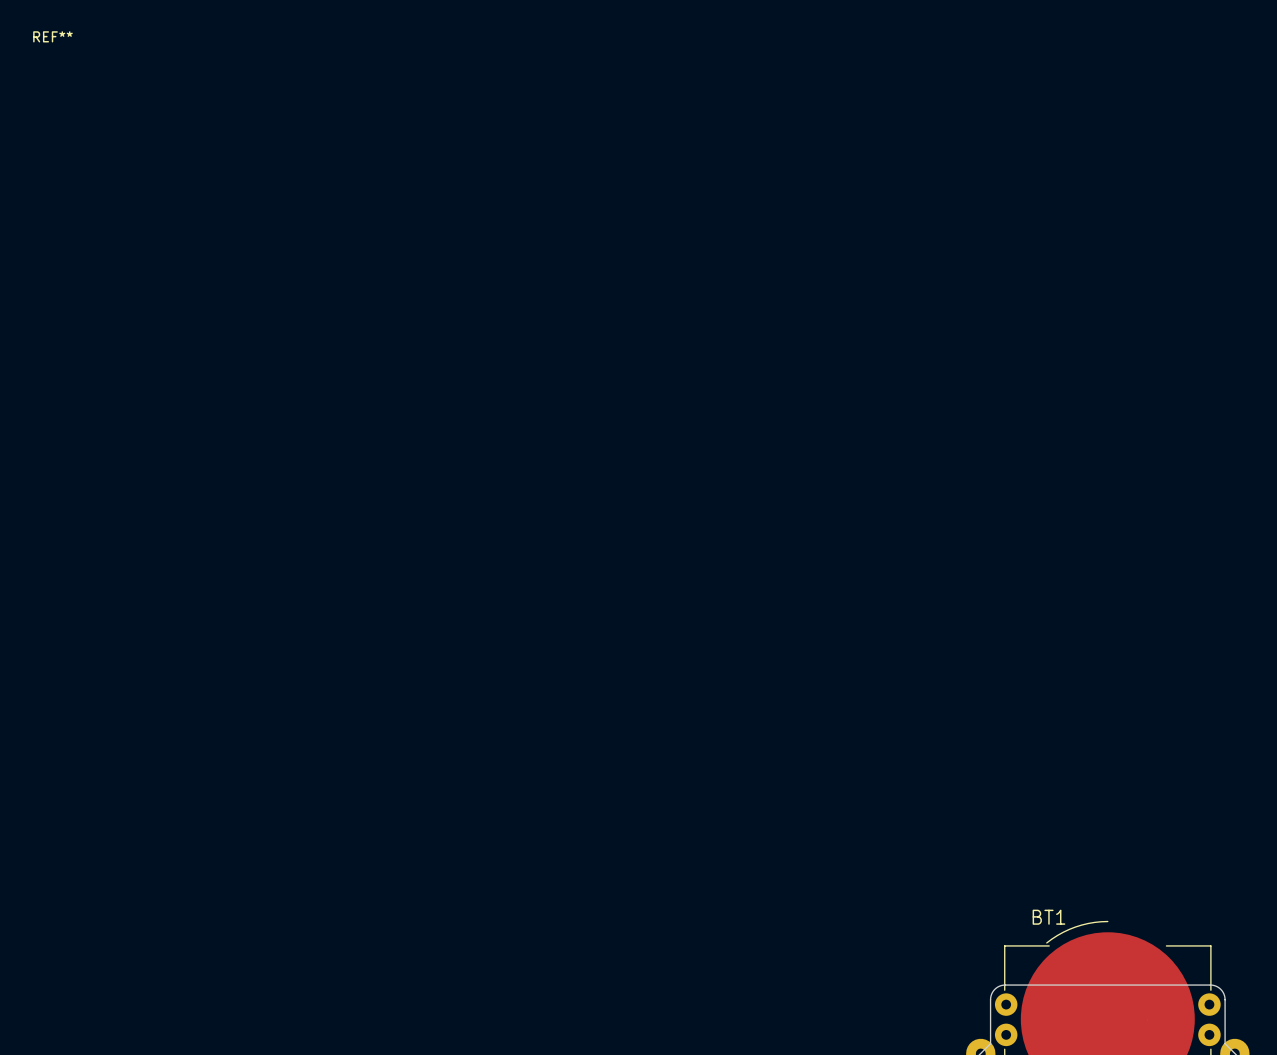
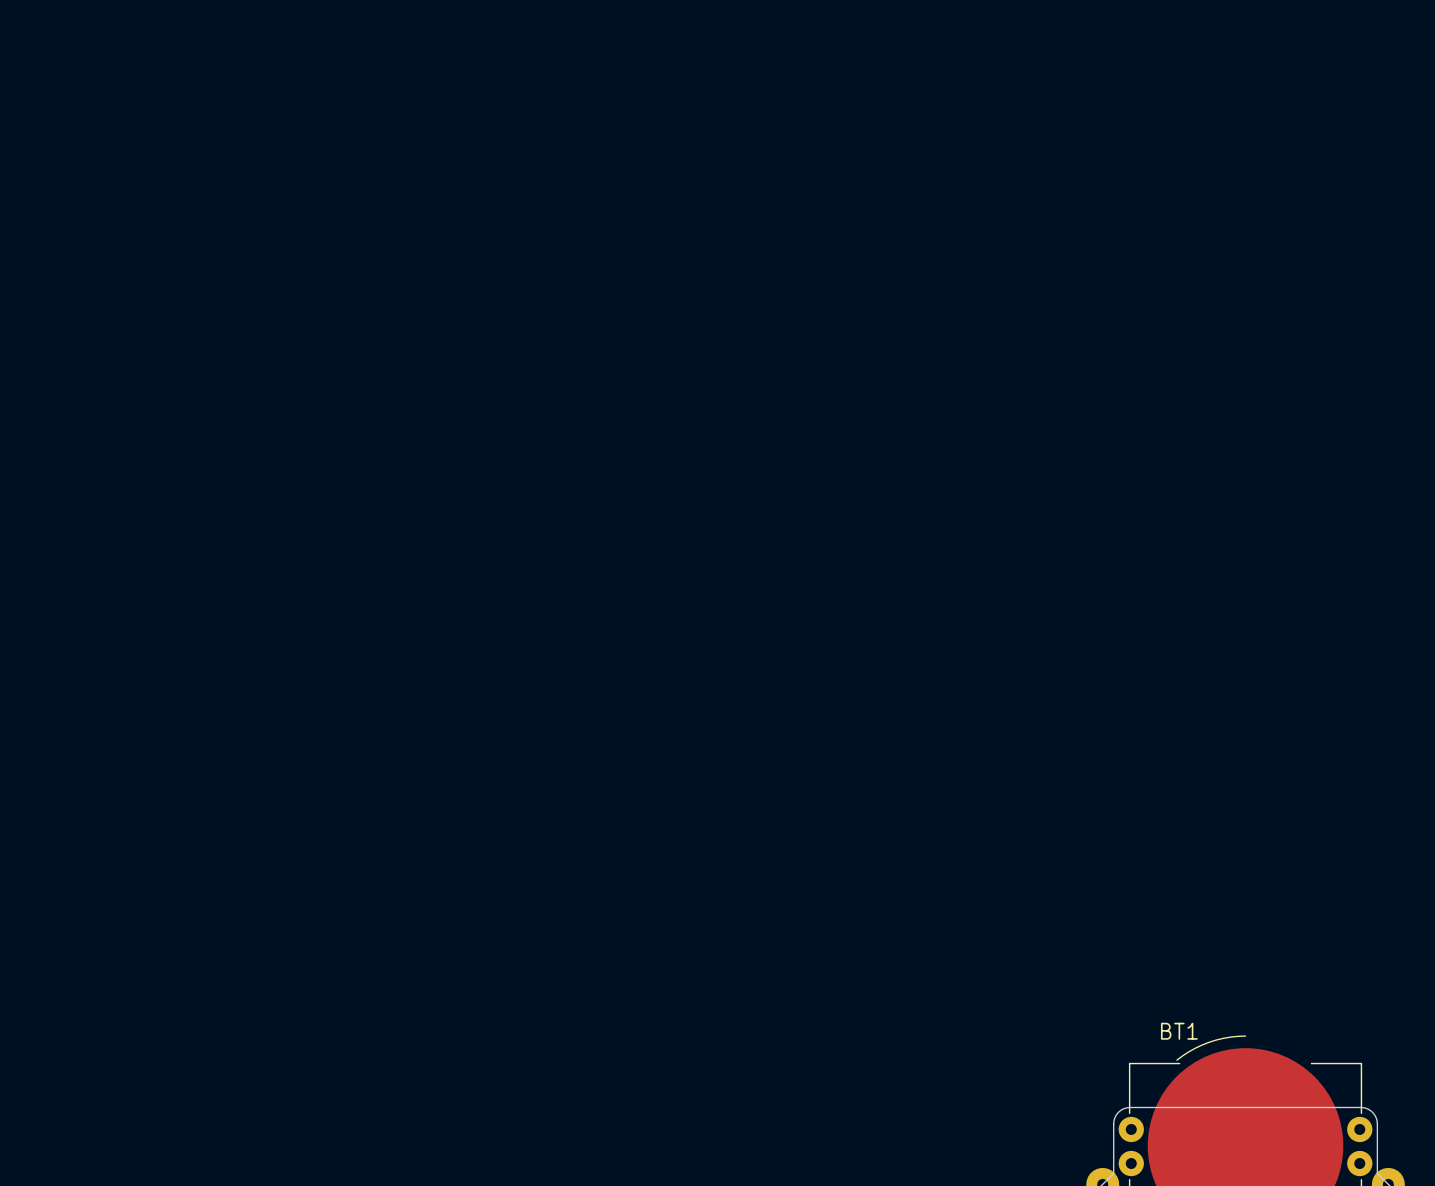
REF**: (52, 36) -> none

